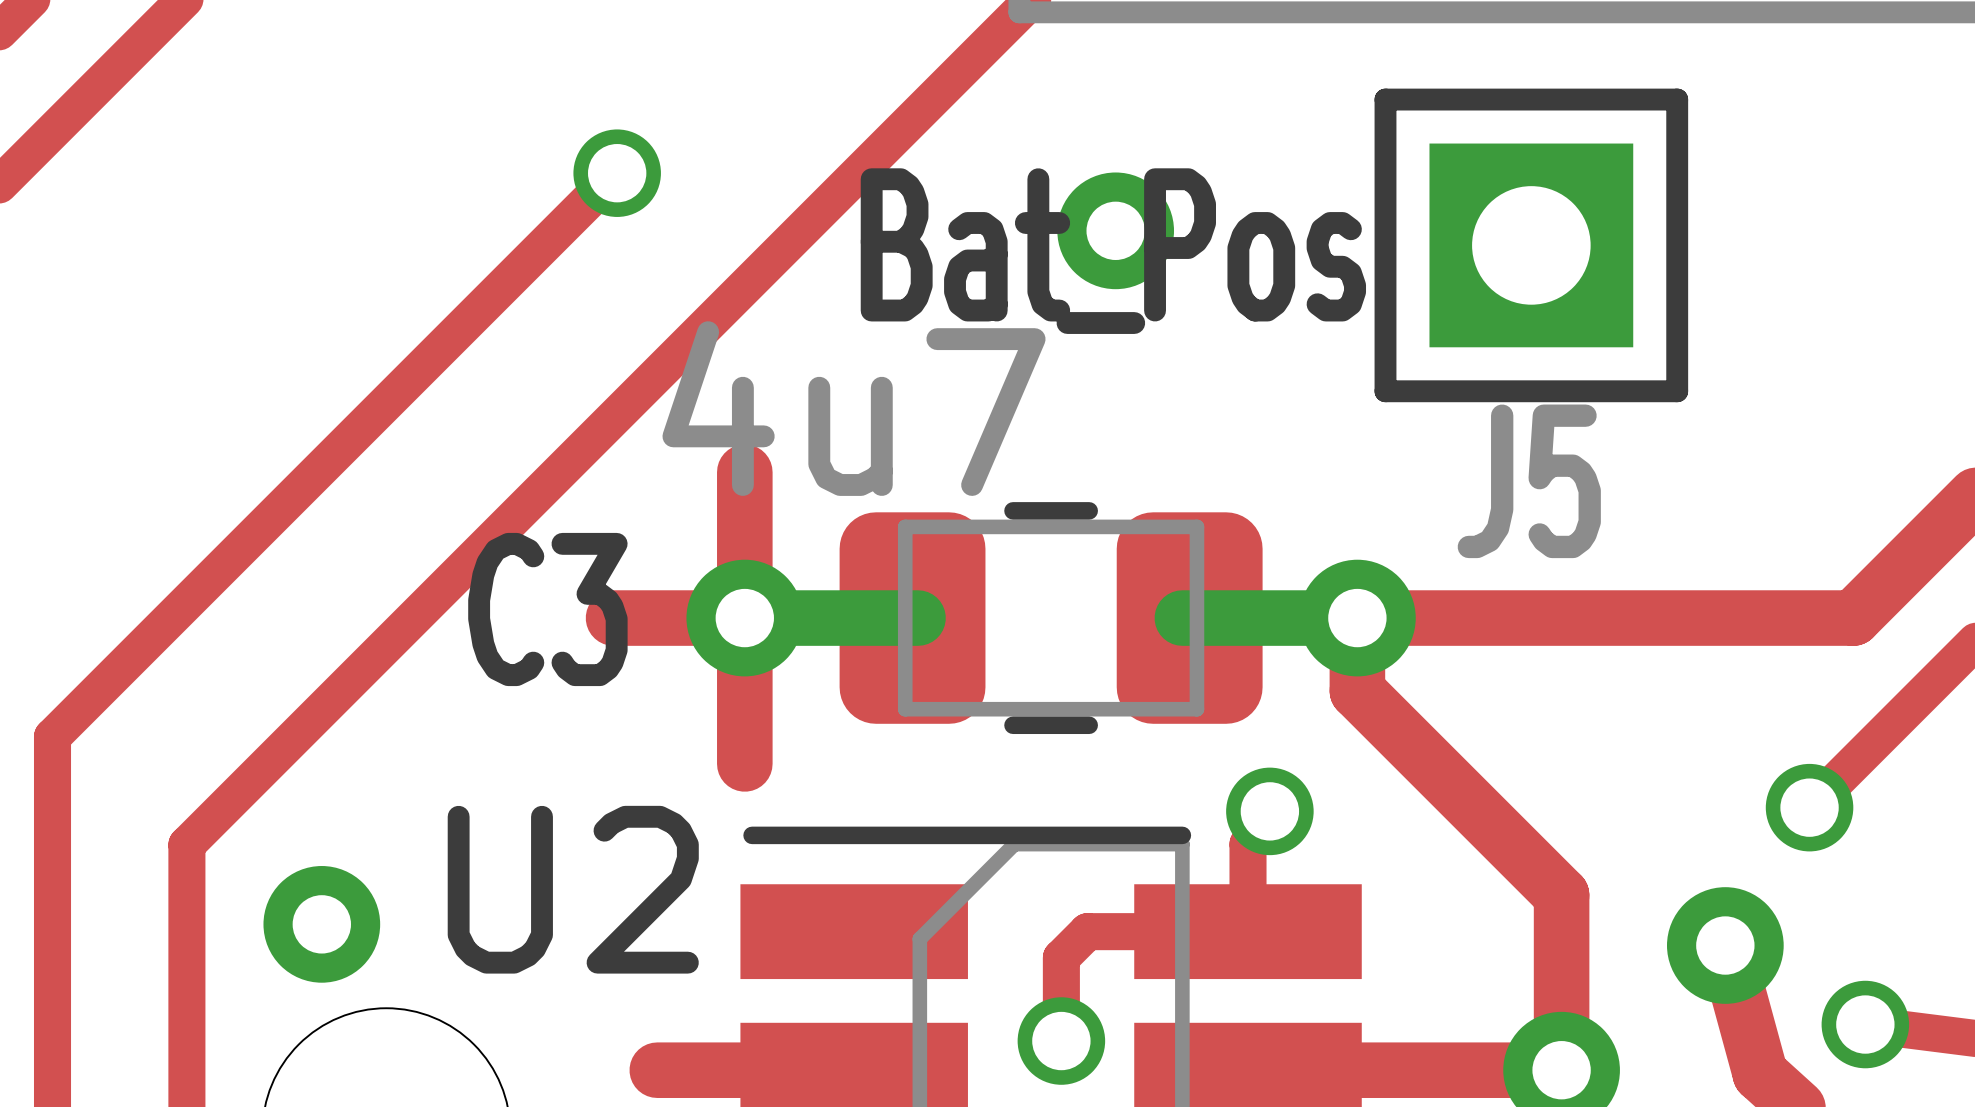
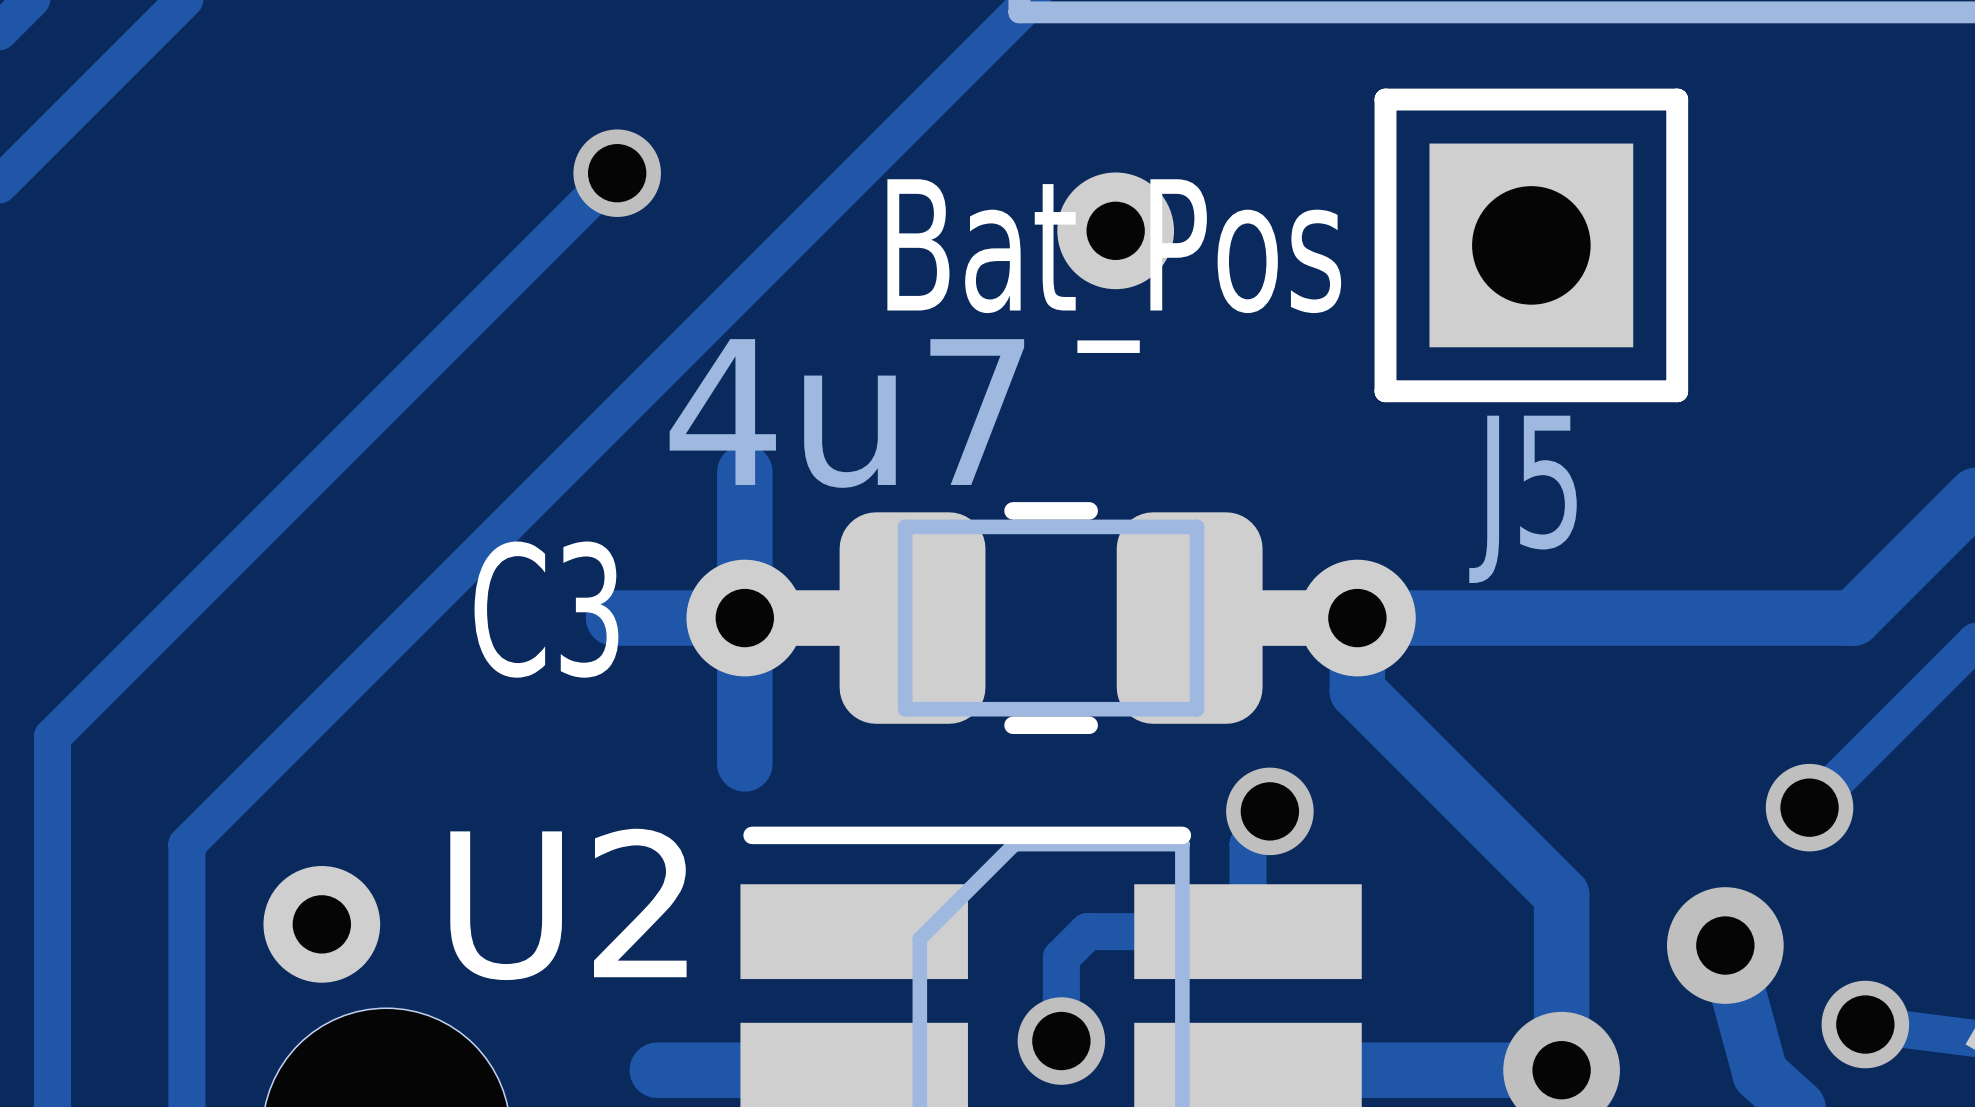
U2 name position: U2 (573, 889) -> U2 (568, 904)

